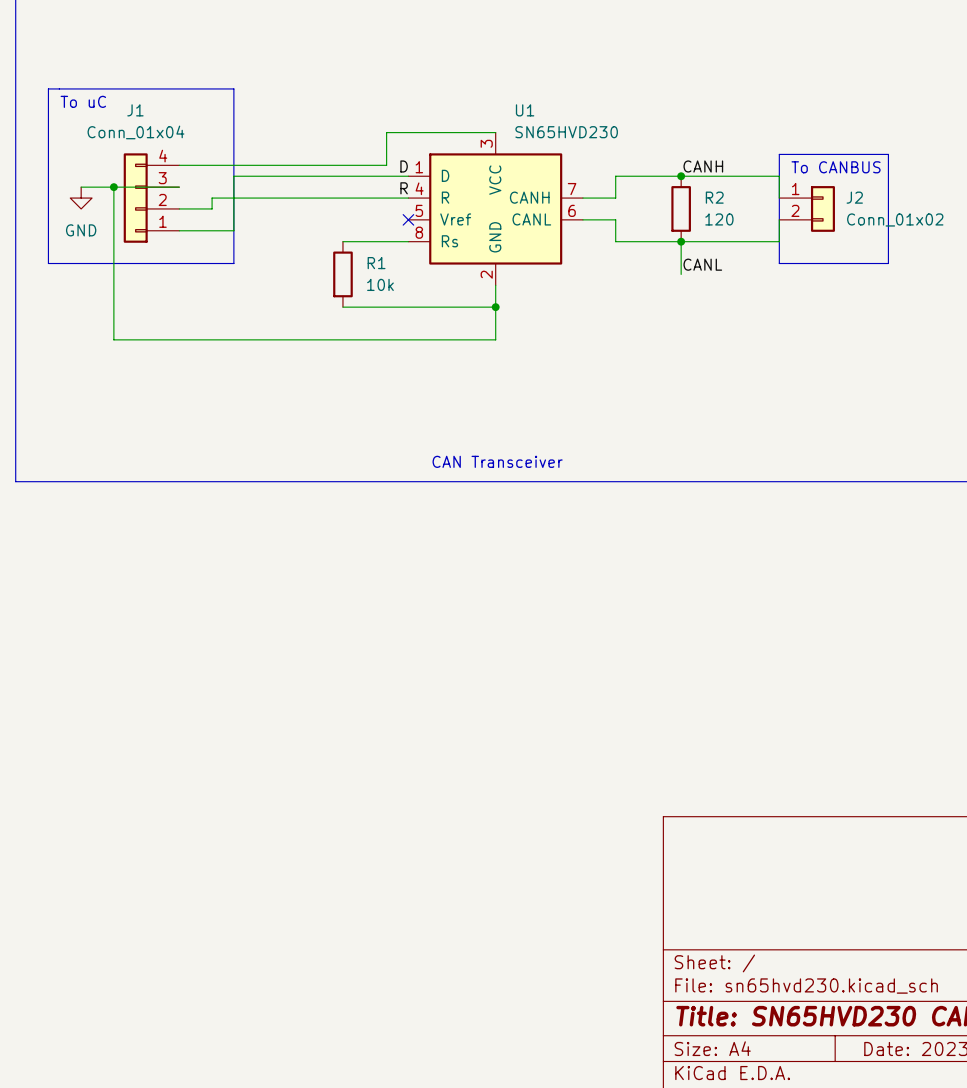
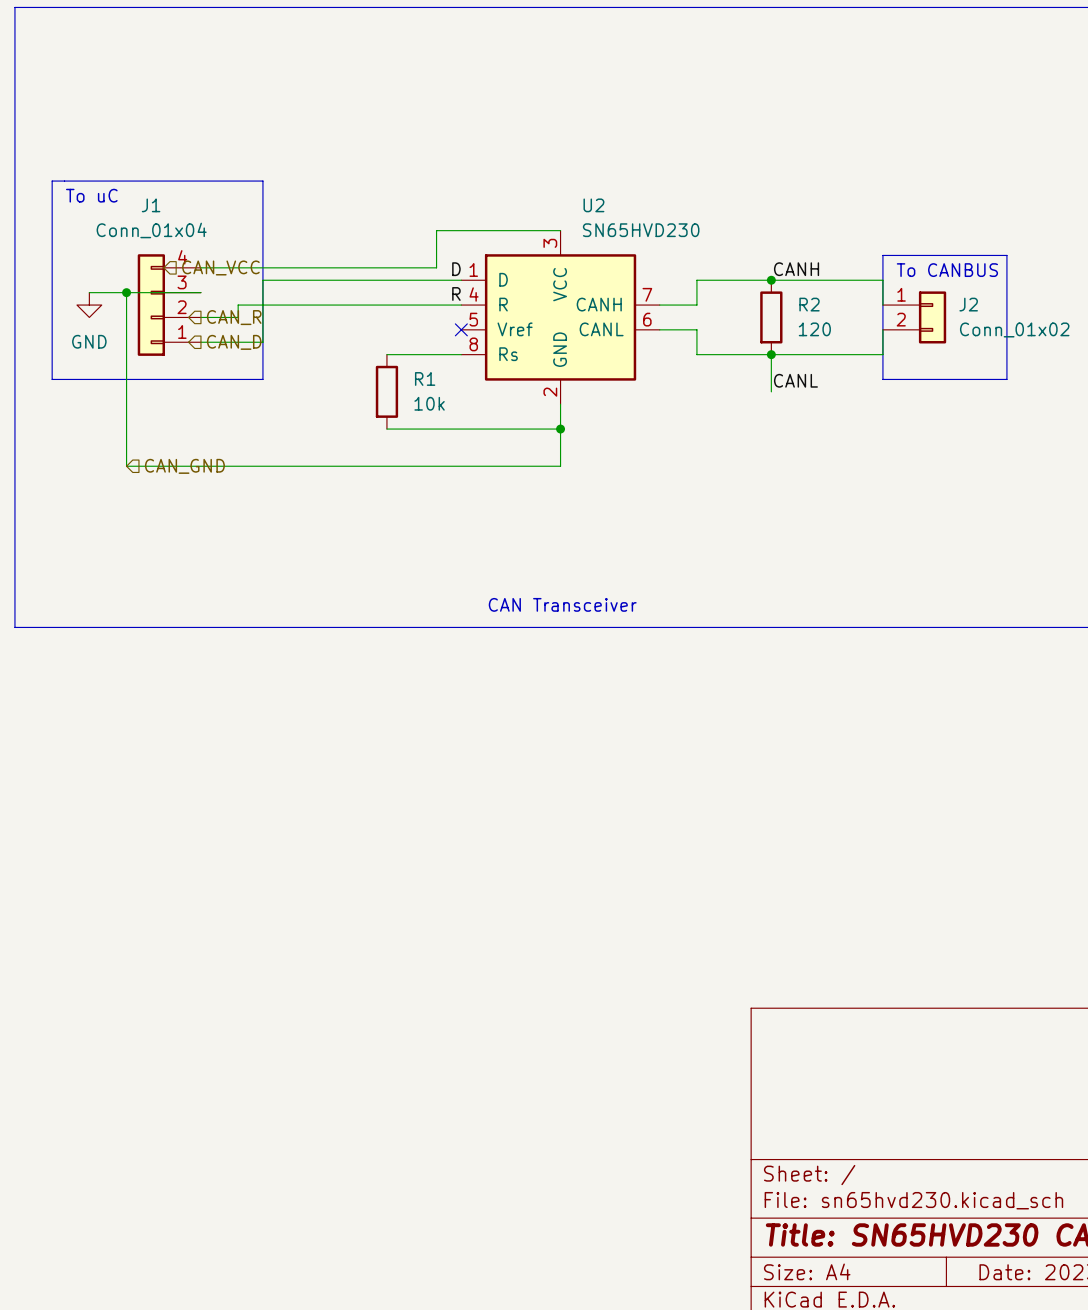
U1 name: U1 (525, 110) -> U2 (593, 205)
hierarchical label: none -> CAN_VCC (220, 267)
hierarchical label: none -> CAN_R (234, 317)
hierarchical label: none -> CAN_D (234, 342)
hierarchical label: none -> CAN_GND (184, 466)

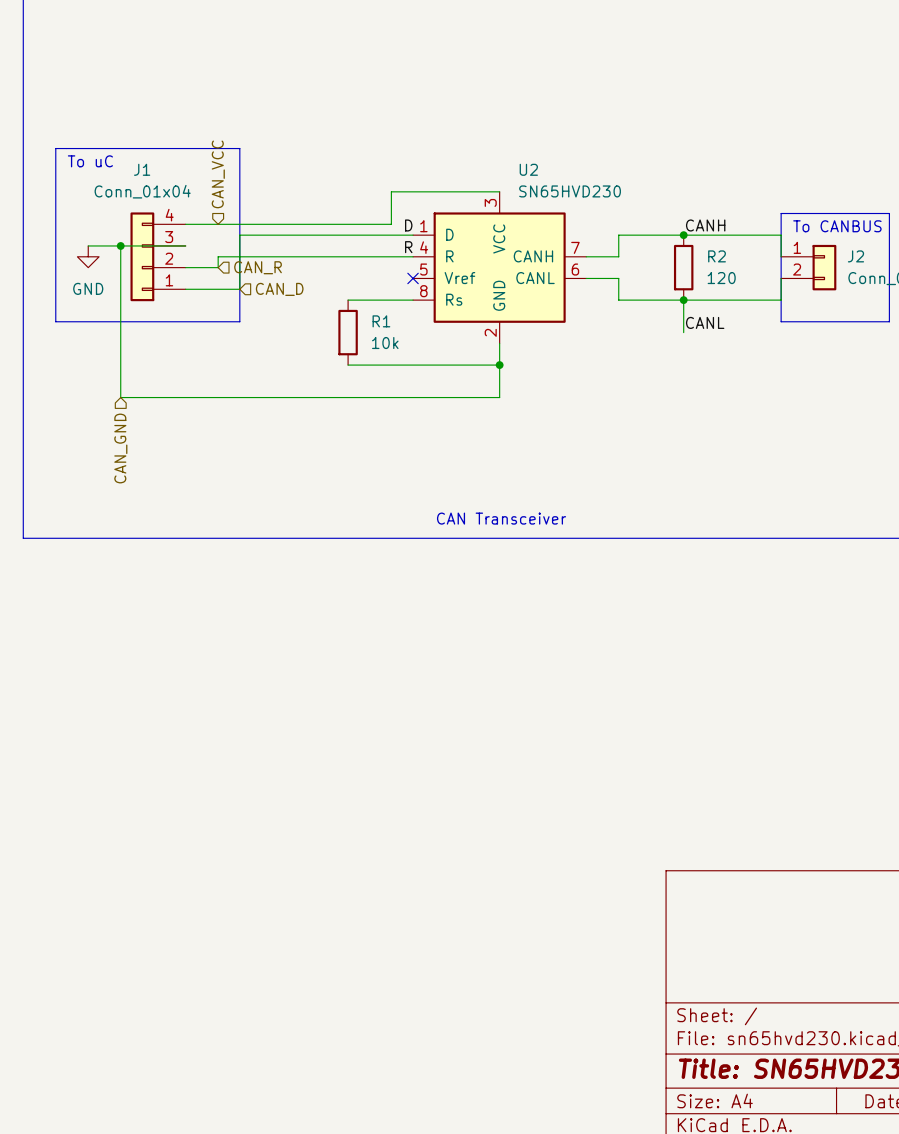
hierarchical label rotation: 0° (220, 267) -> 90° counterclockwise (218, 174)
hierarchical label position: CAN_R (234, 317) -> CAN_R (258, 267)
hierarchical label position: CAN_D (234, 342) -> CAN_D (279, 289)
hierarchical label rotation: 0° (184, 466) -> 90° clockwise (120, 448)

